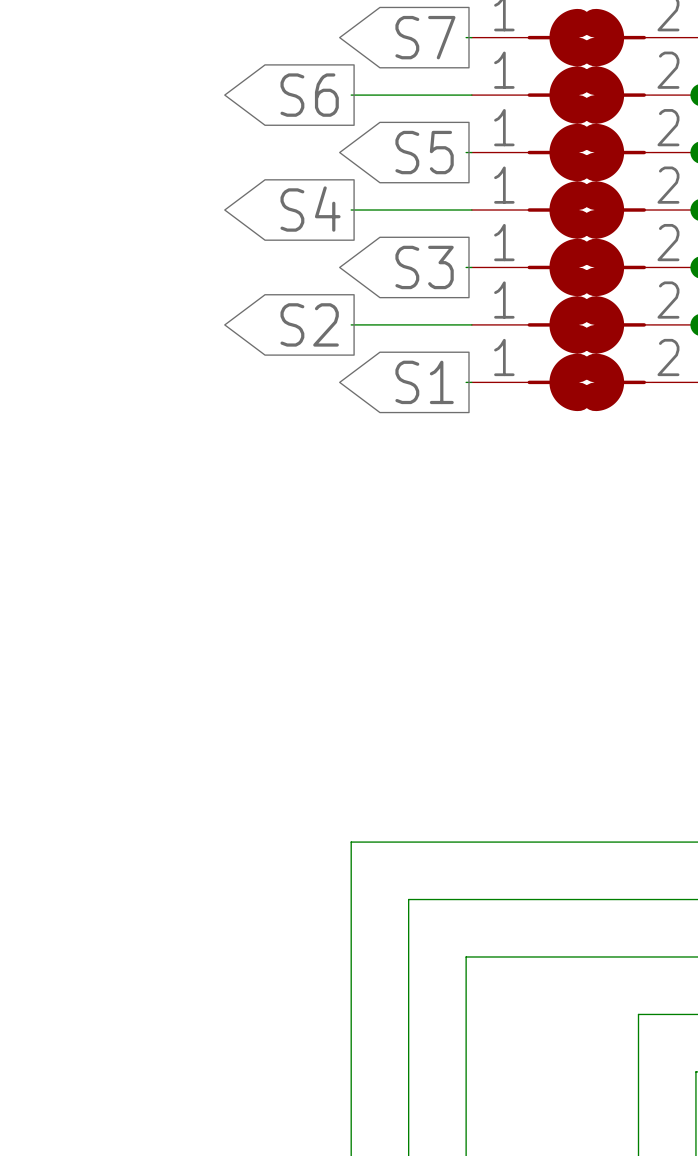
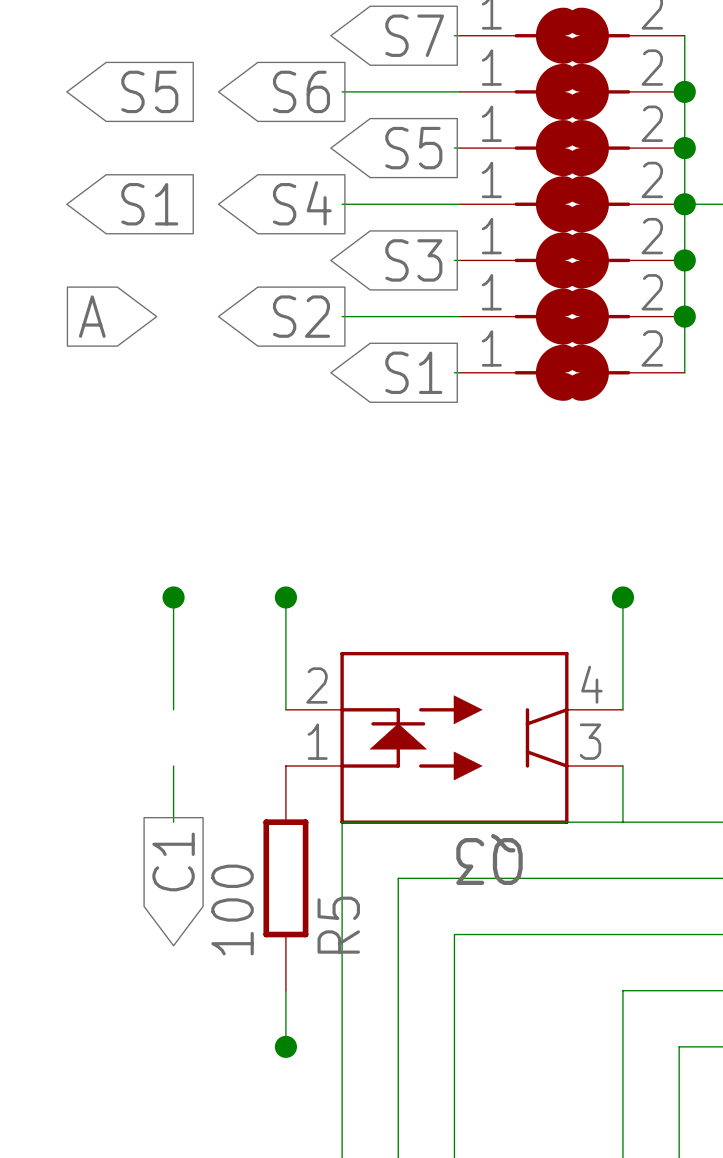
global label: none -> S5 (149, 91)
global label: none -> S1 (149, 204)
global label: none -> A (92, 316)
wire: none -> (173, 597) (173, 709)
junction: none -> (173, 597)
wire: none -> (285, 597) (285, 709)
junction: none -> (285, 597)
wire: none -> (622, 597) (622, 709)
junction: none -> (622, 597)
Q3: none -> (454, 737)
wire: none -> (173, 766) (173, 822)
wire: none -> (622, 766) (622, 822)
global label: none -> C1 (173, 861)
R5: none -> 100 (285, 878)
wire: none -> (285, 990) (285, 1046)
junction: none -> (285, 1046)

